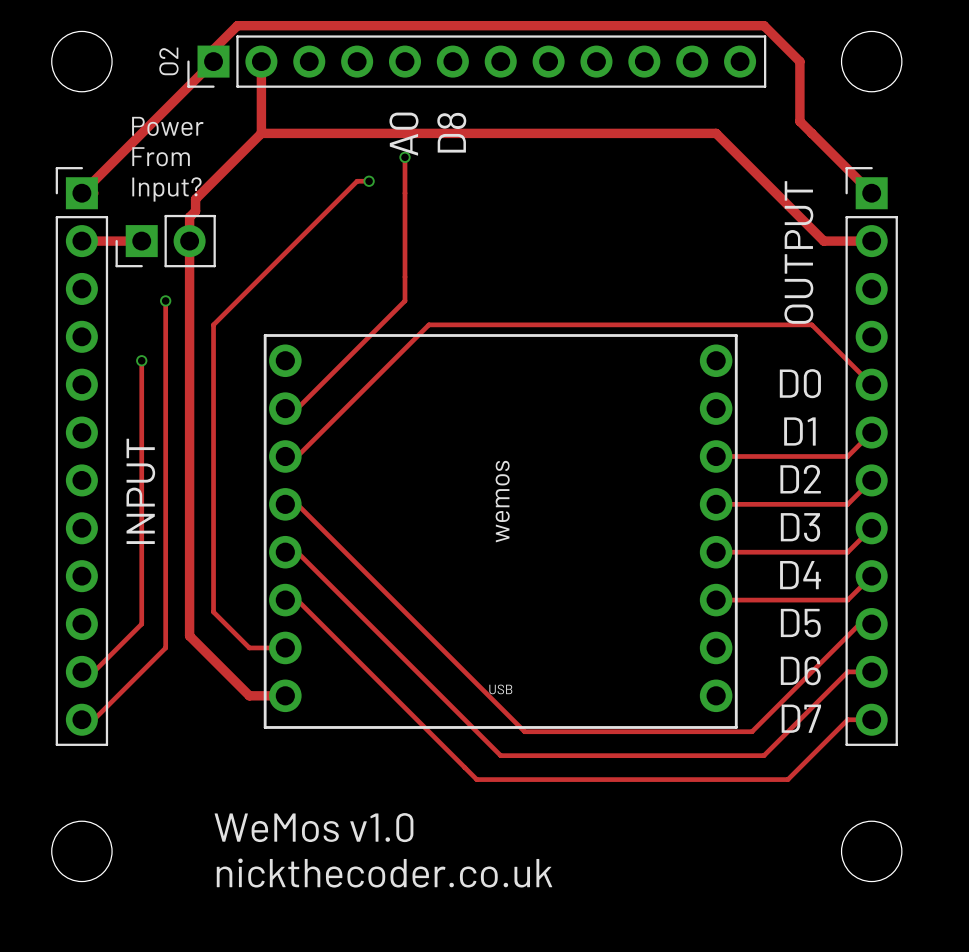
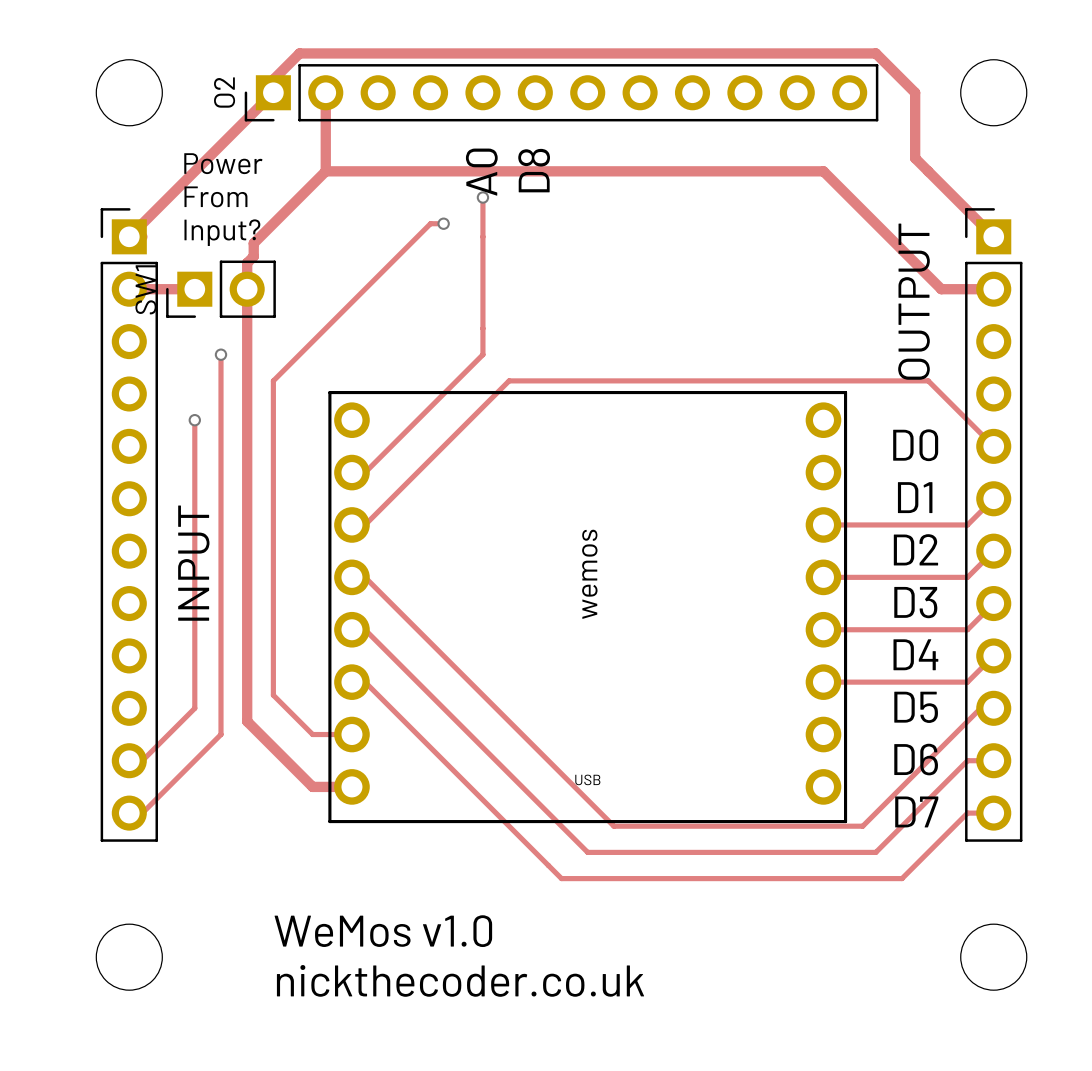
SW1 name: none -> SW1 (145, 289)

